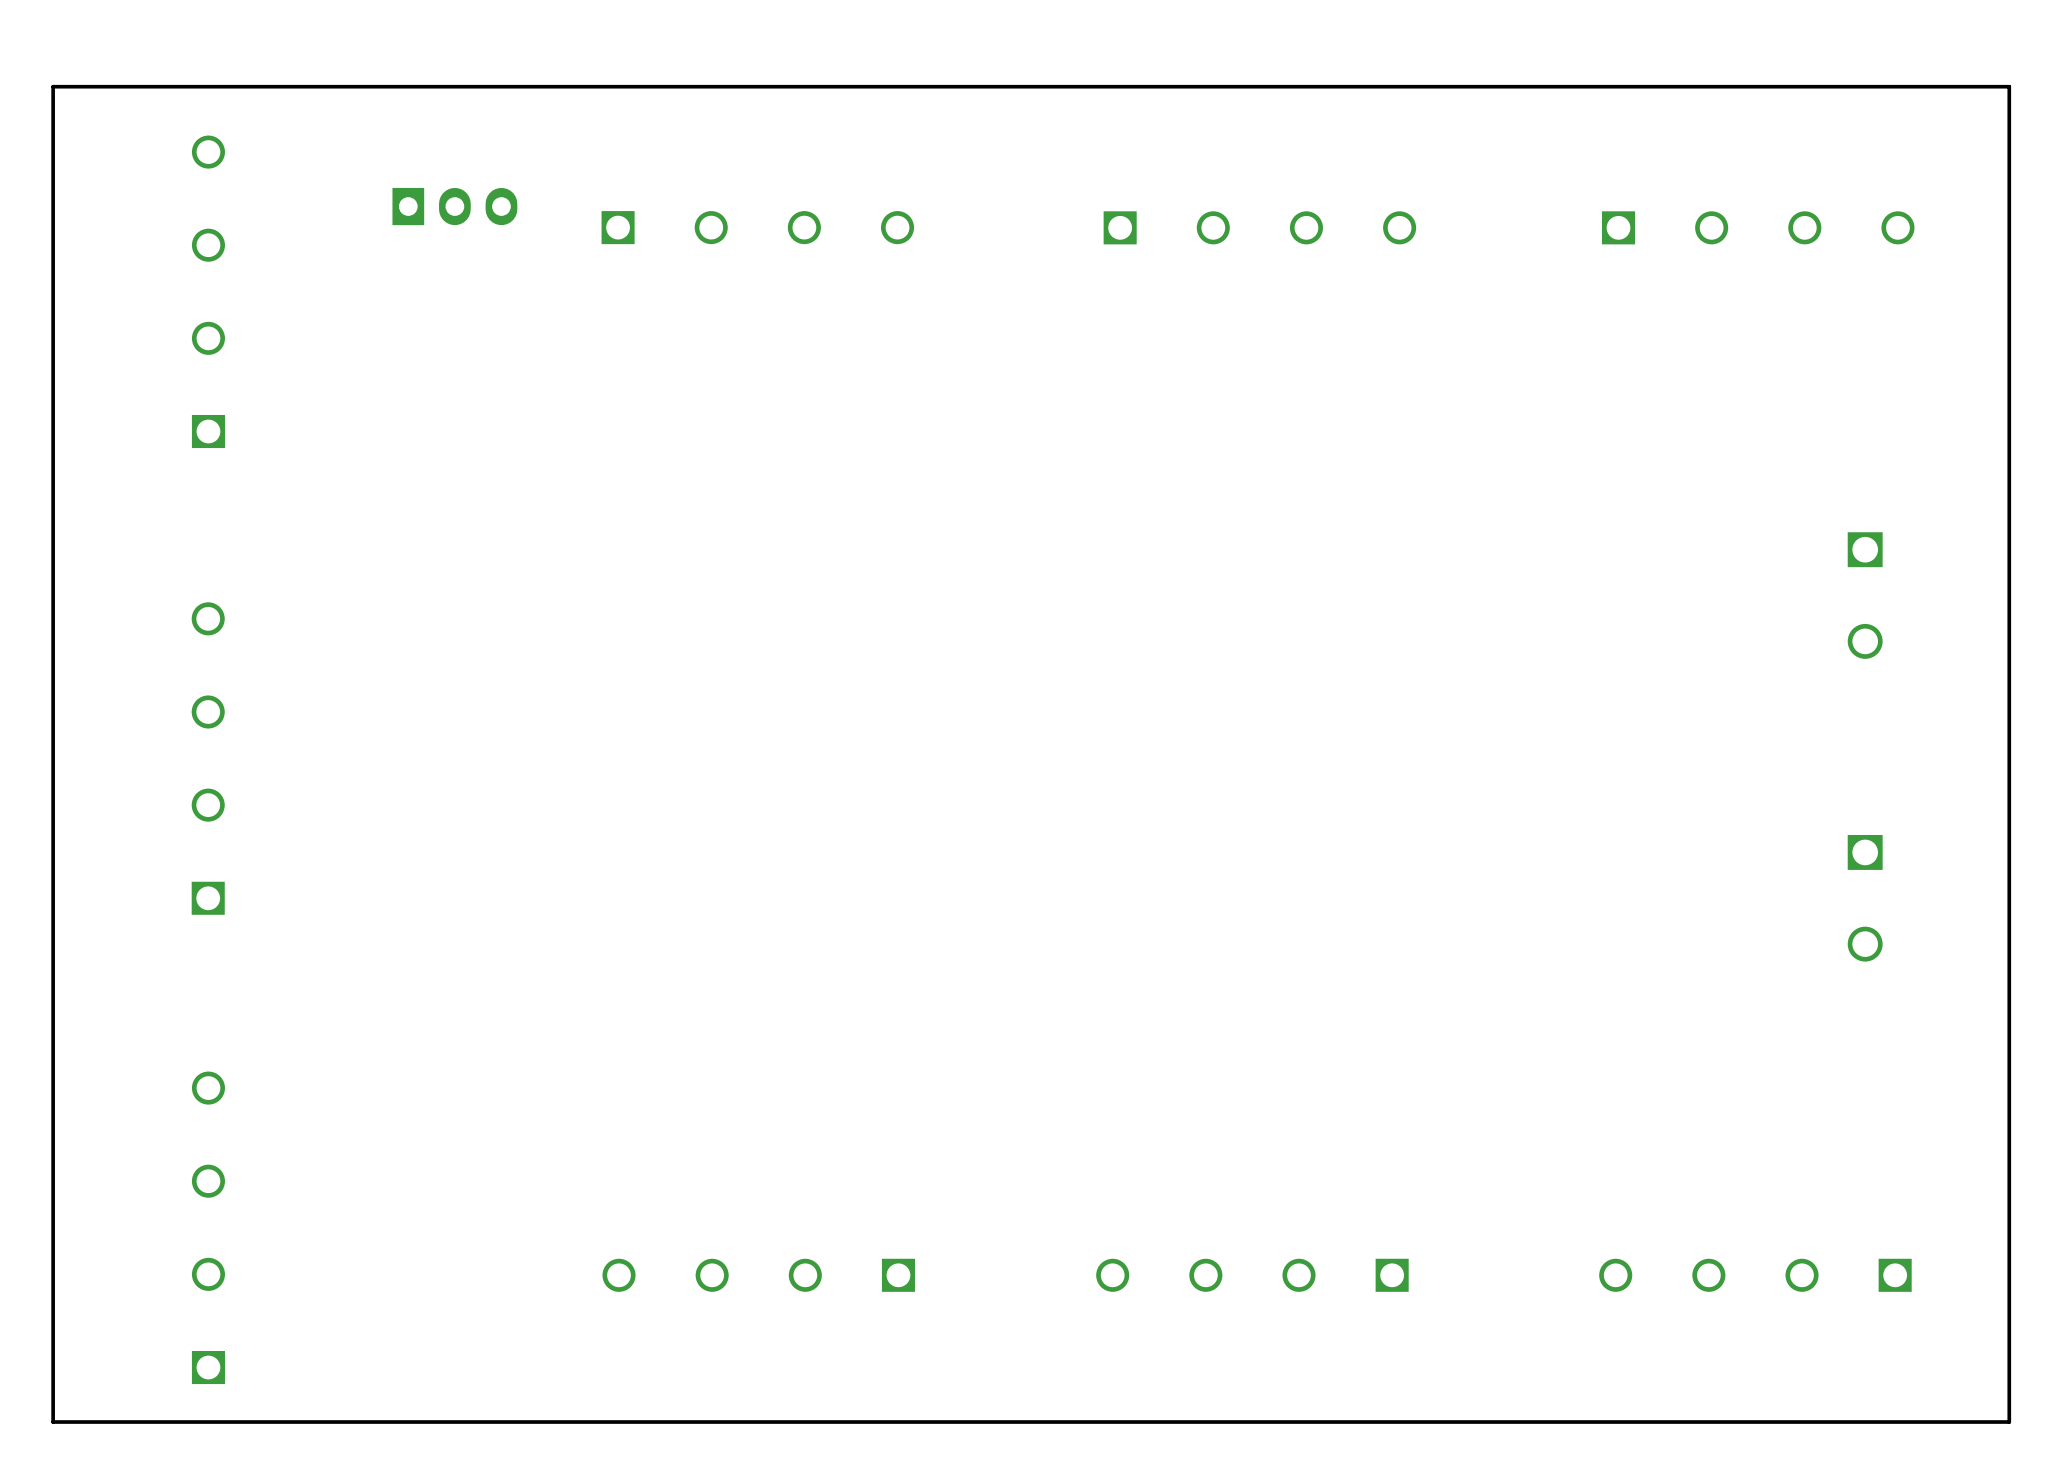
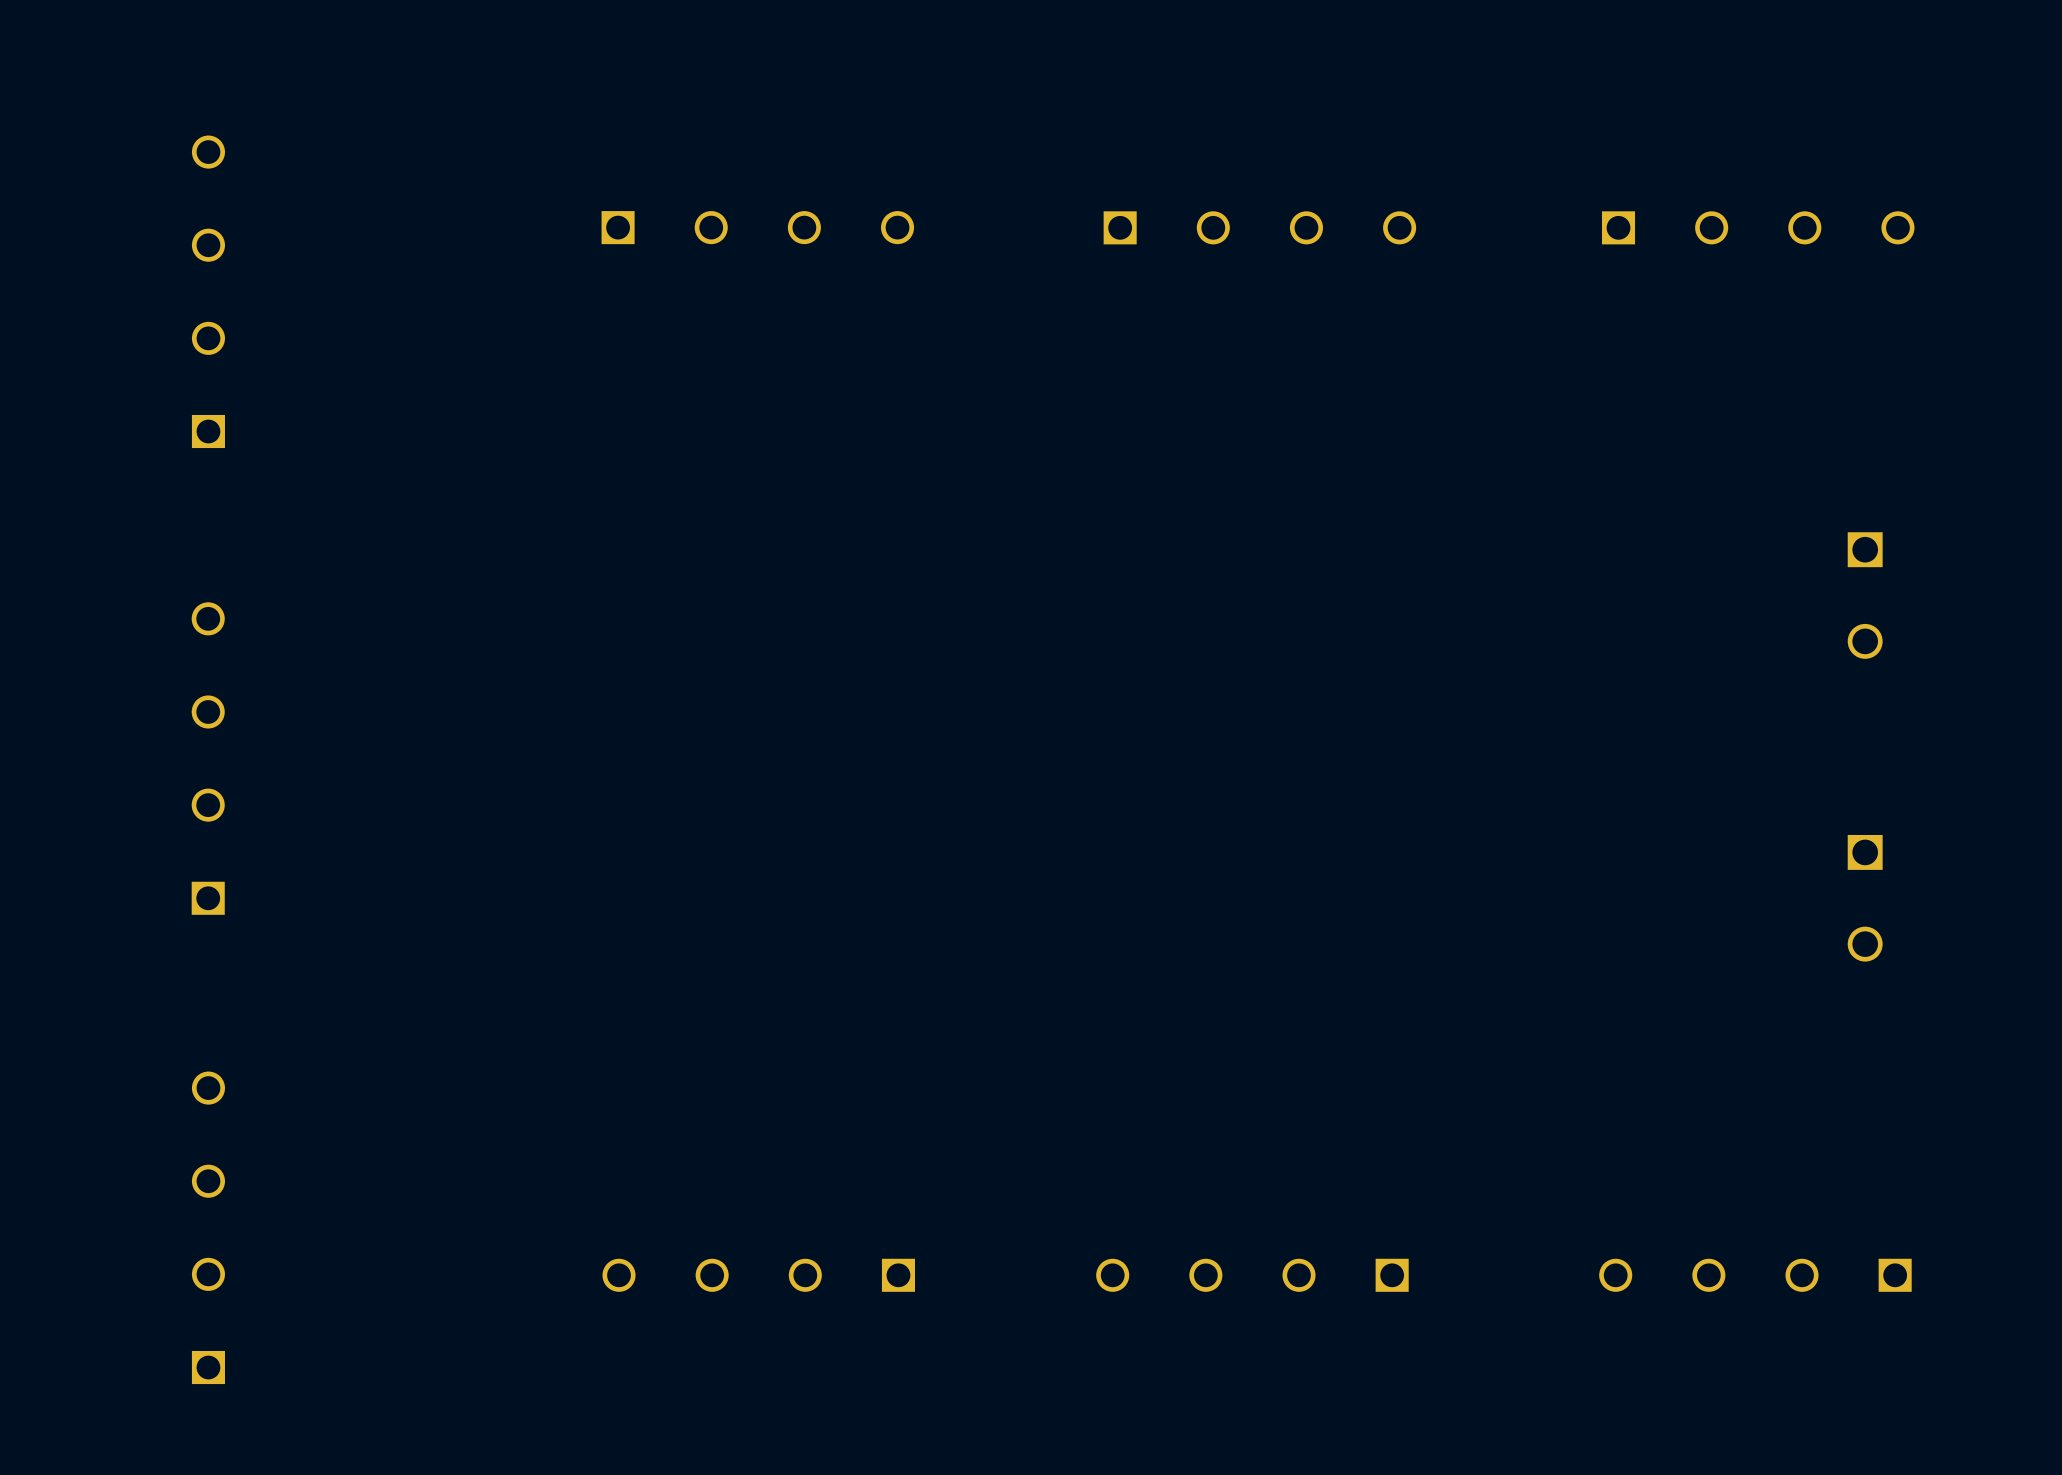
board edge: (2009, 86) (53, 86) (53, 1422) (2009, 1422) (2009, 86) -> none
part: (454, 206) -> none

